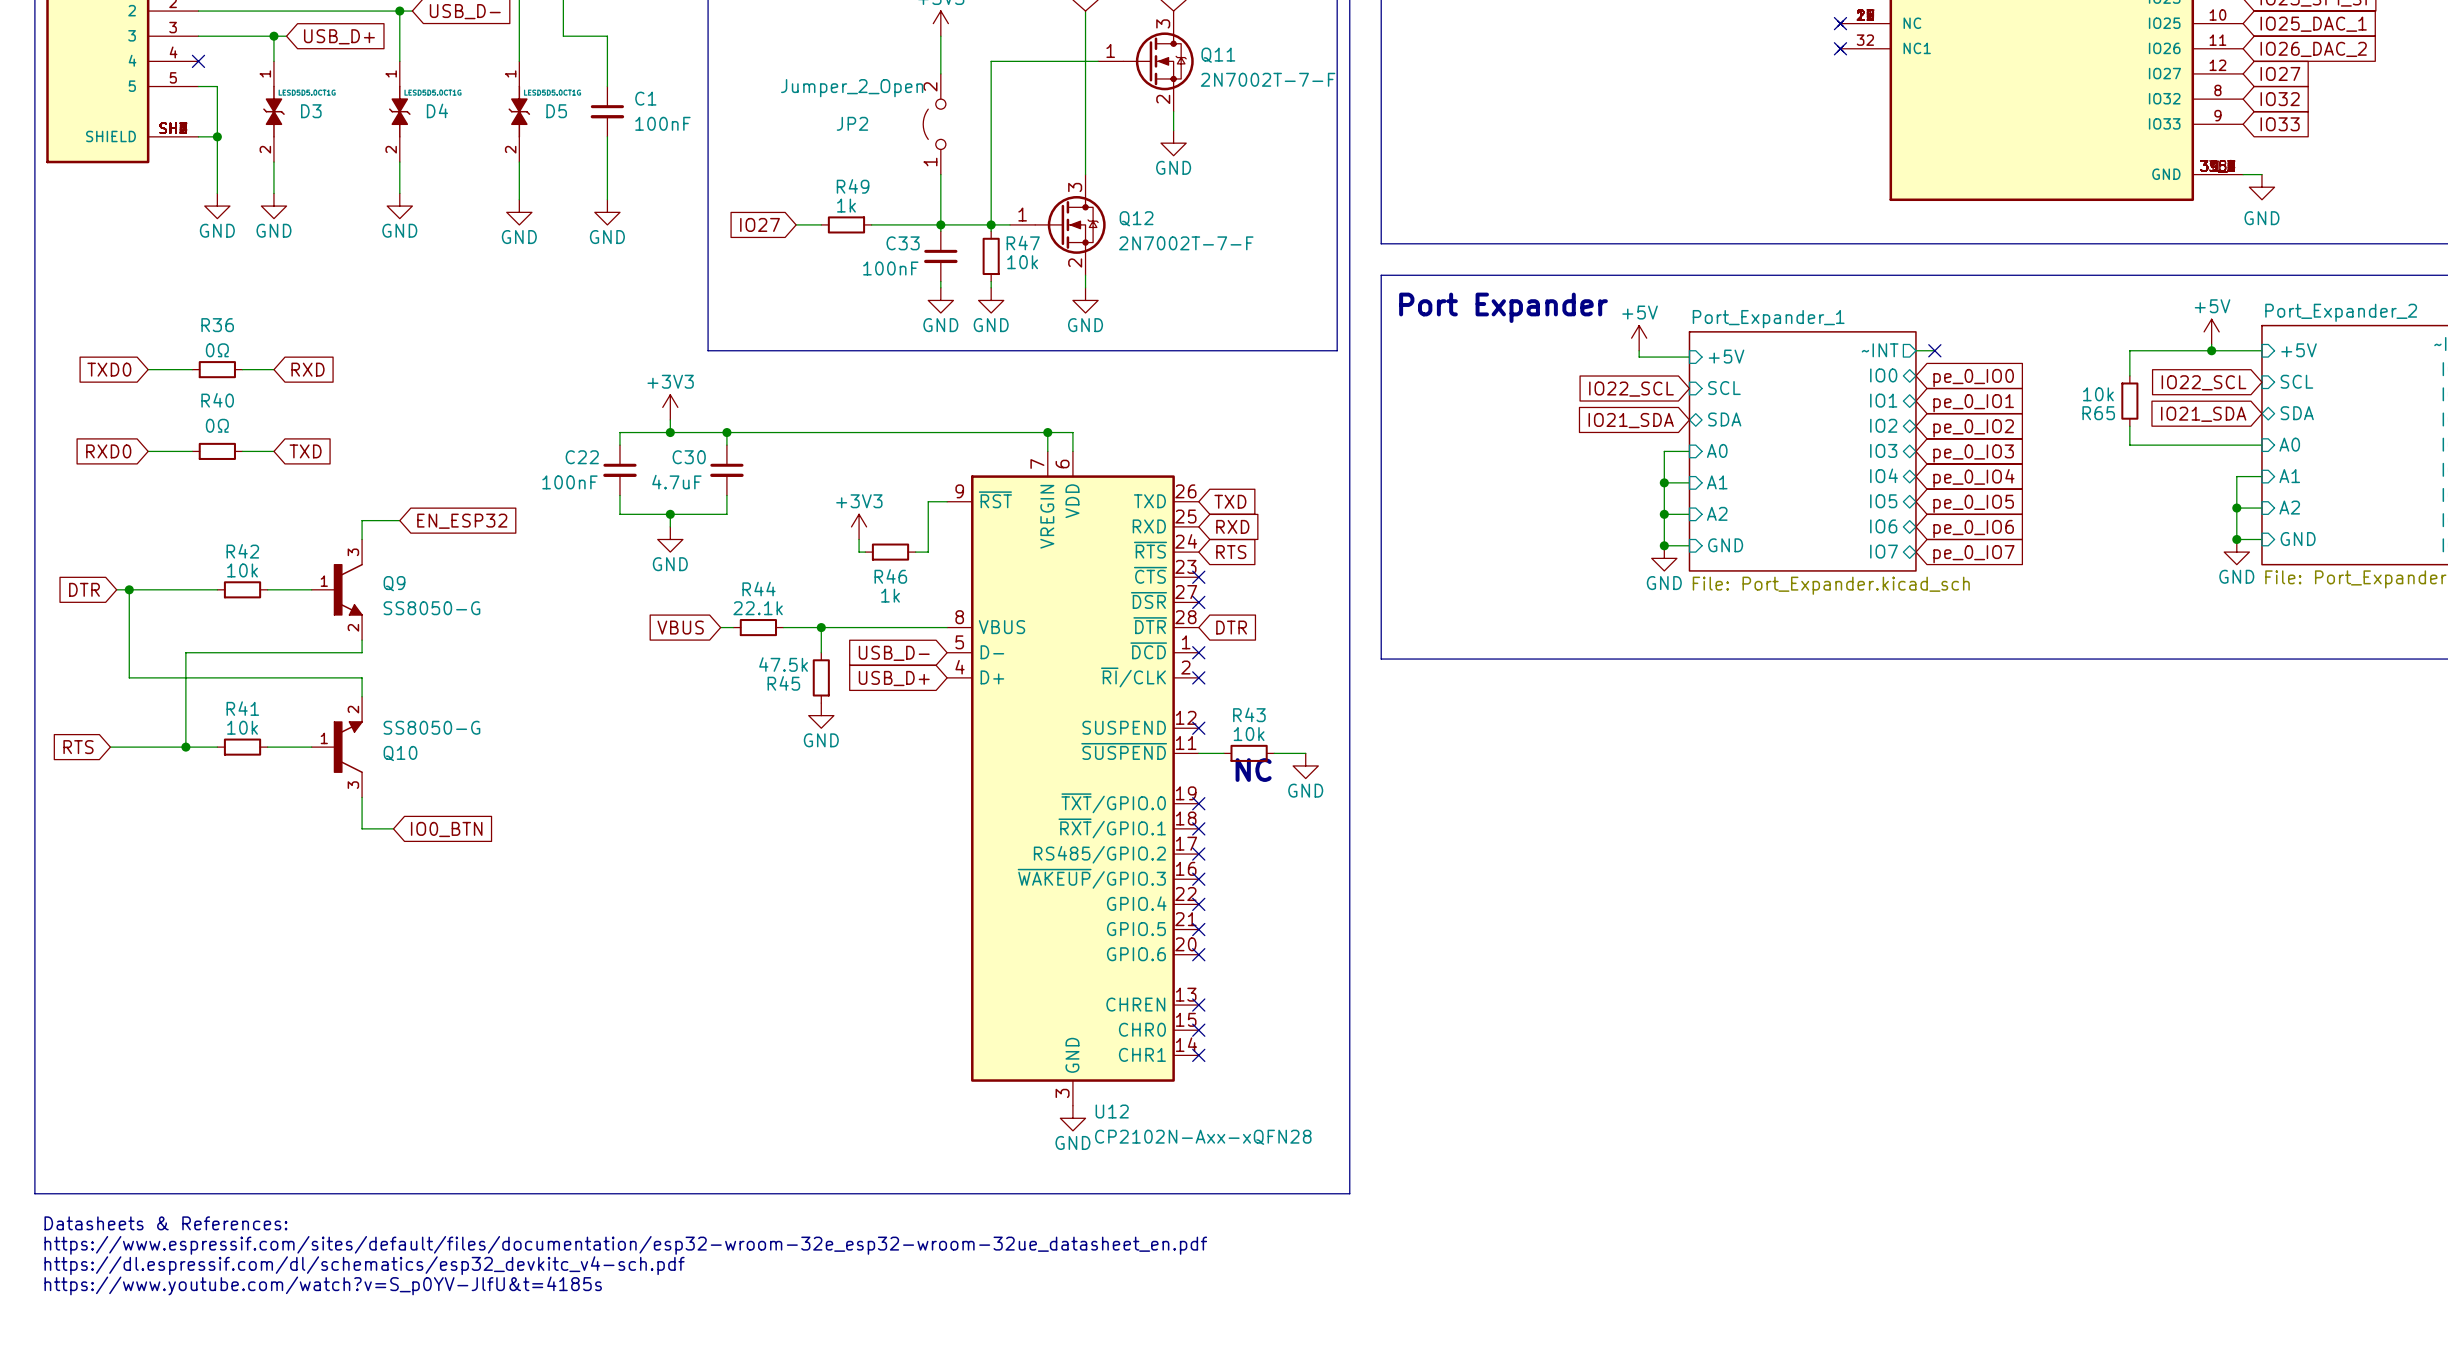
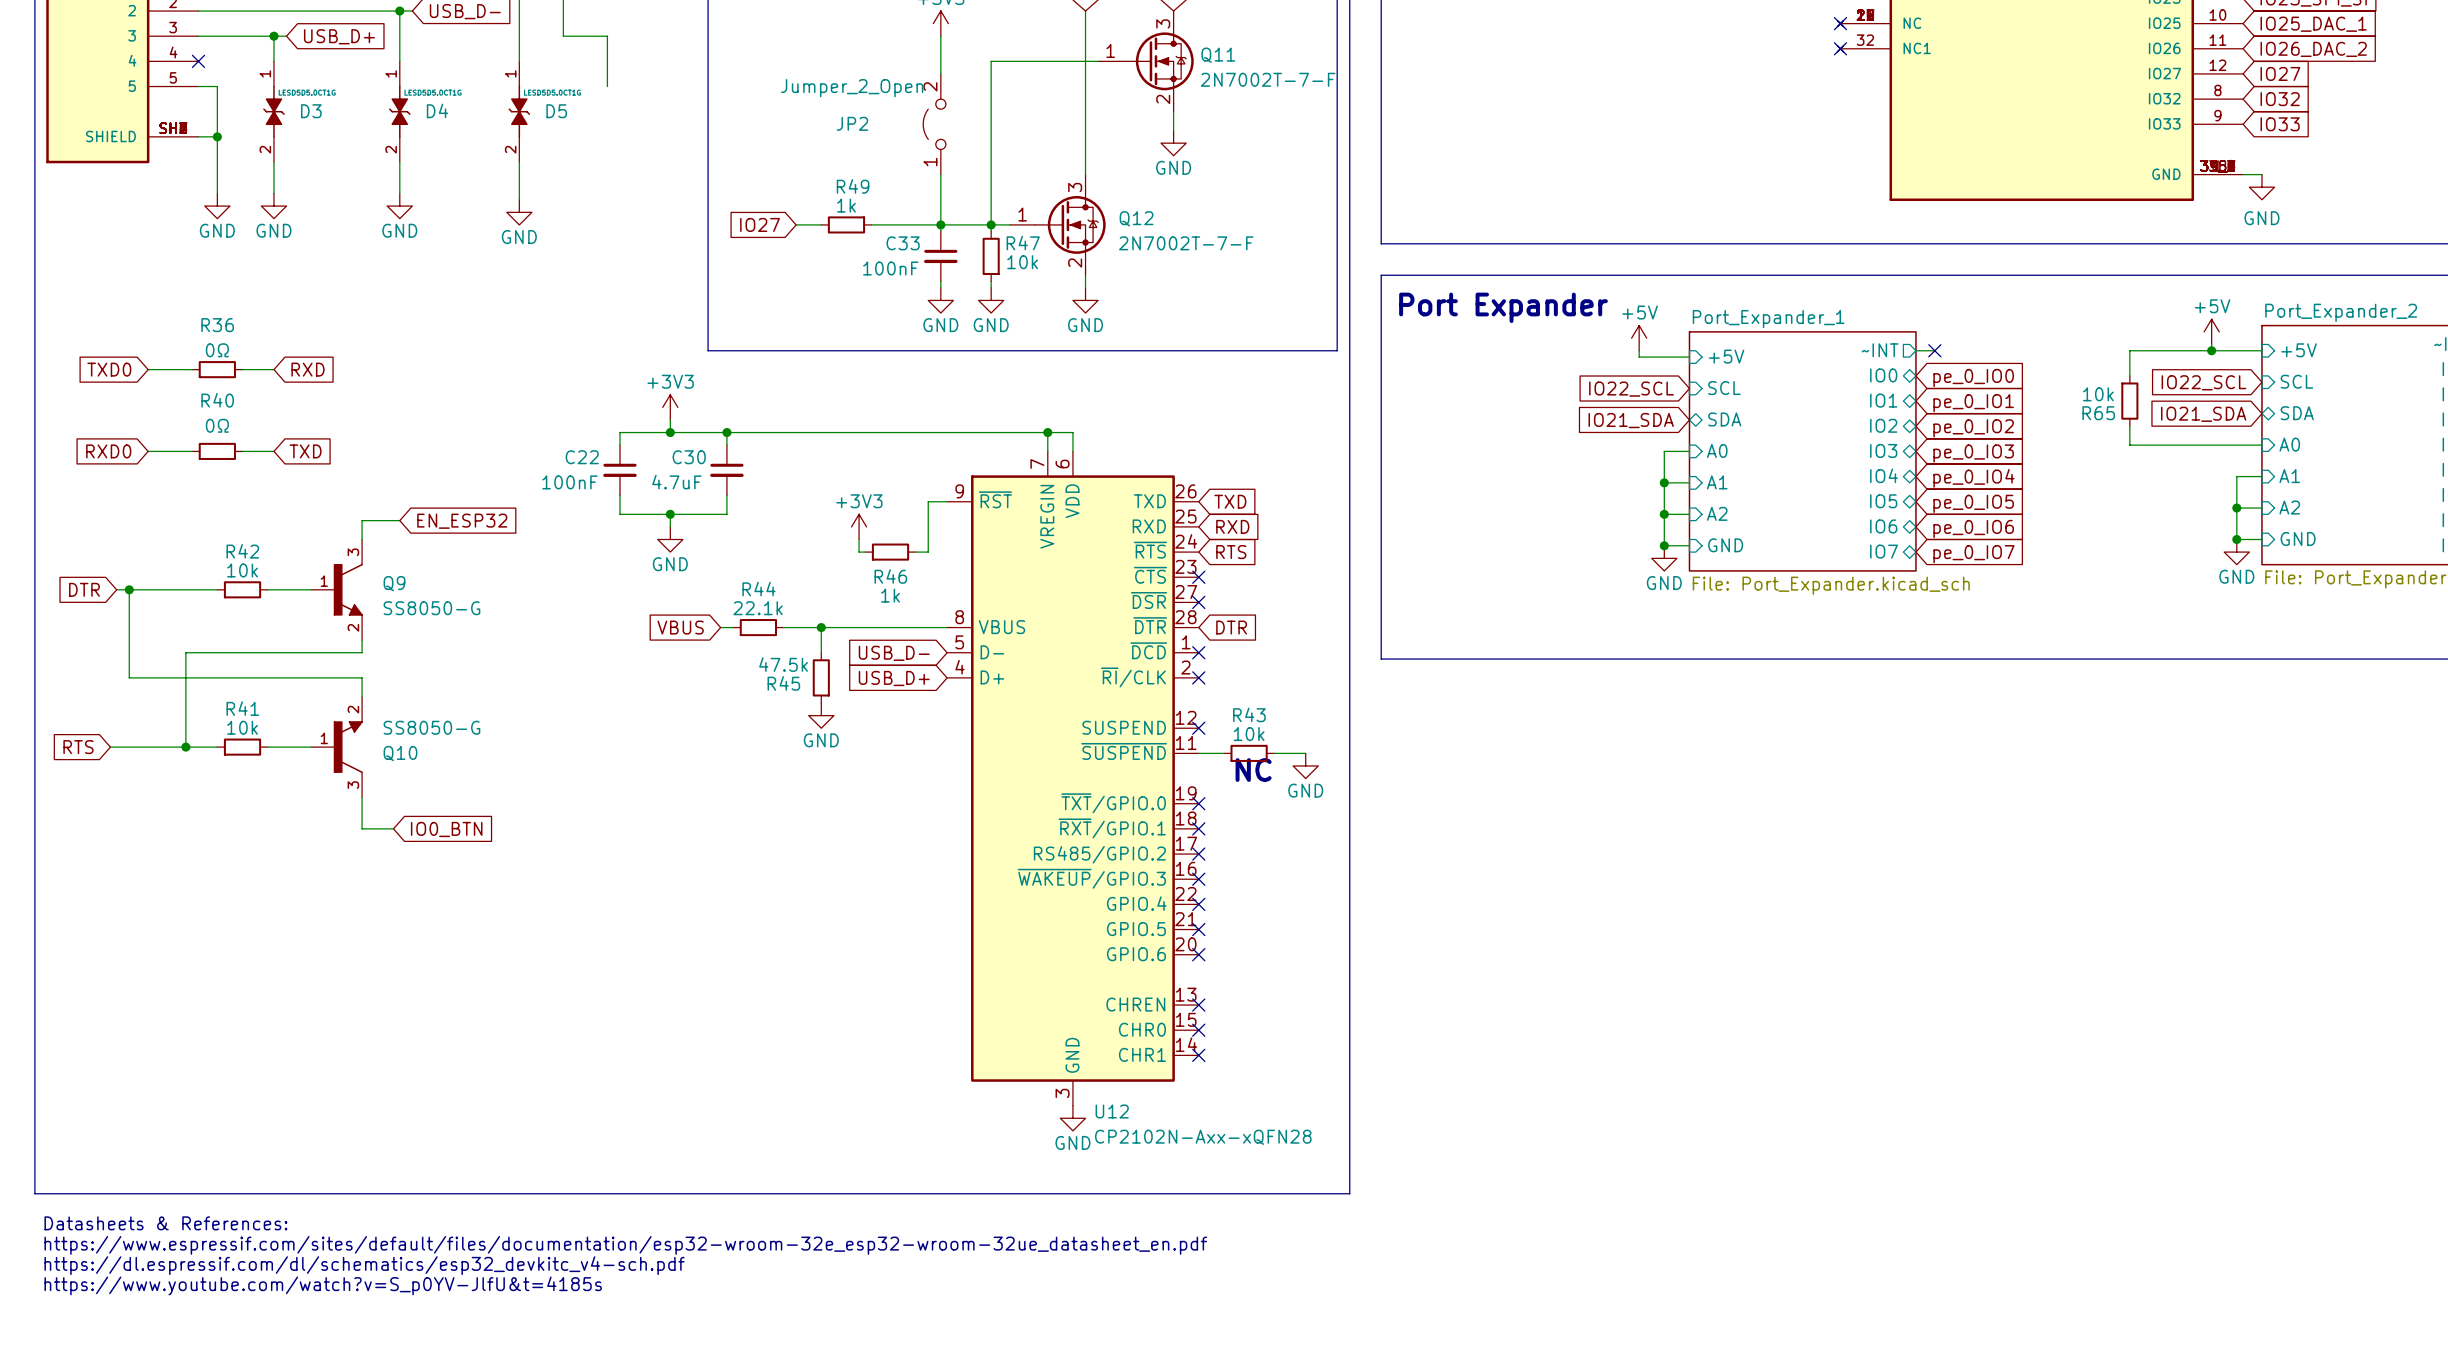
C1: 100nF (607, 111) -> none
wire: (607, 136) (607, 199) -> none
power symbol: GND (607, 212) -> none

